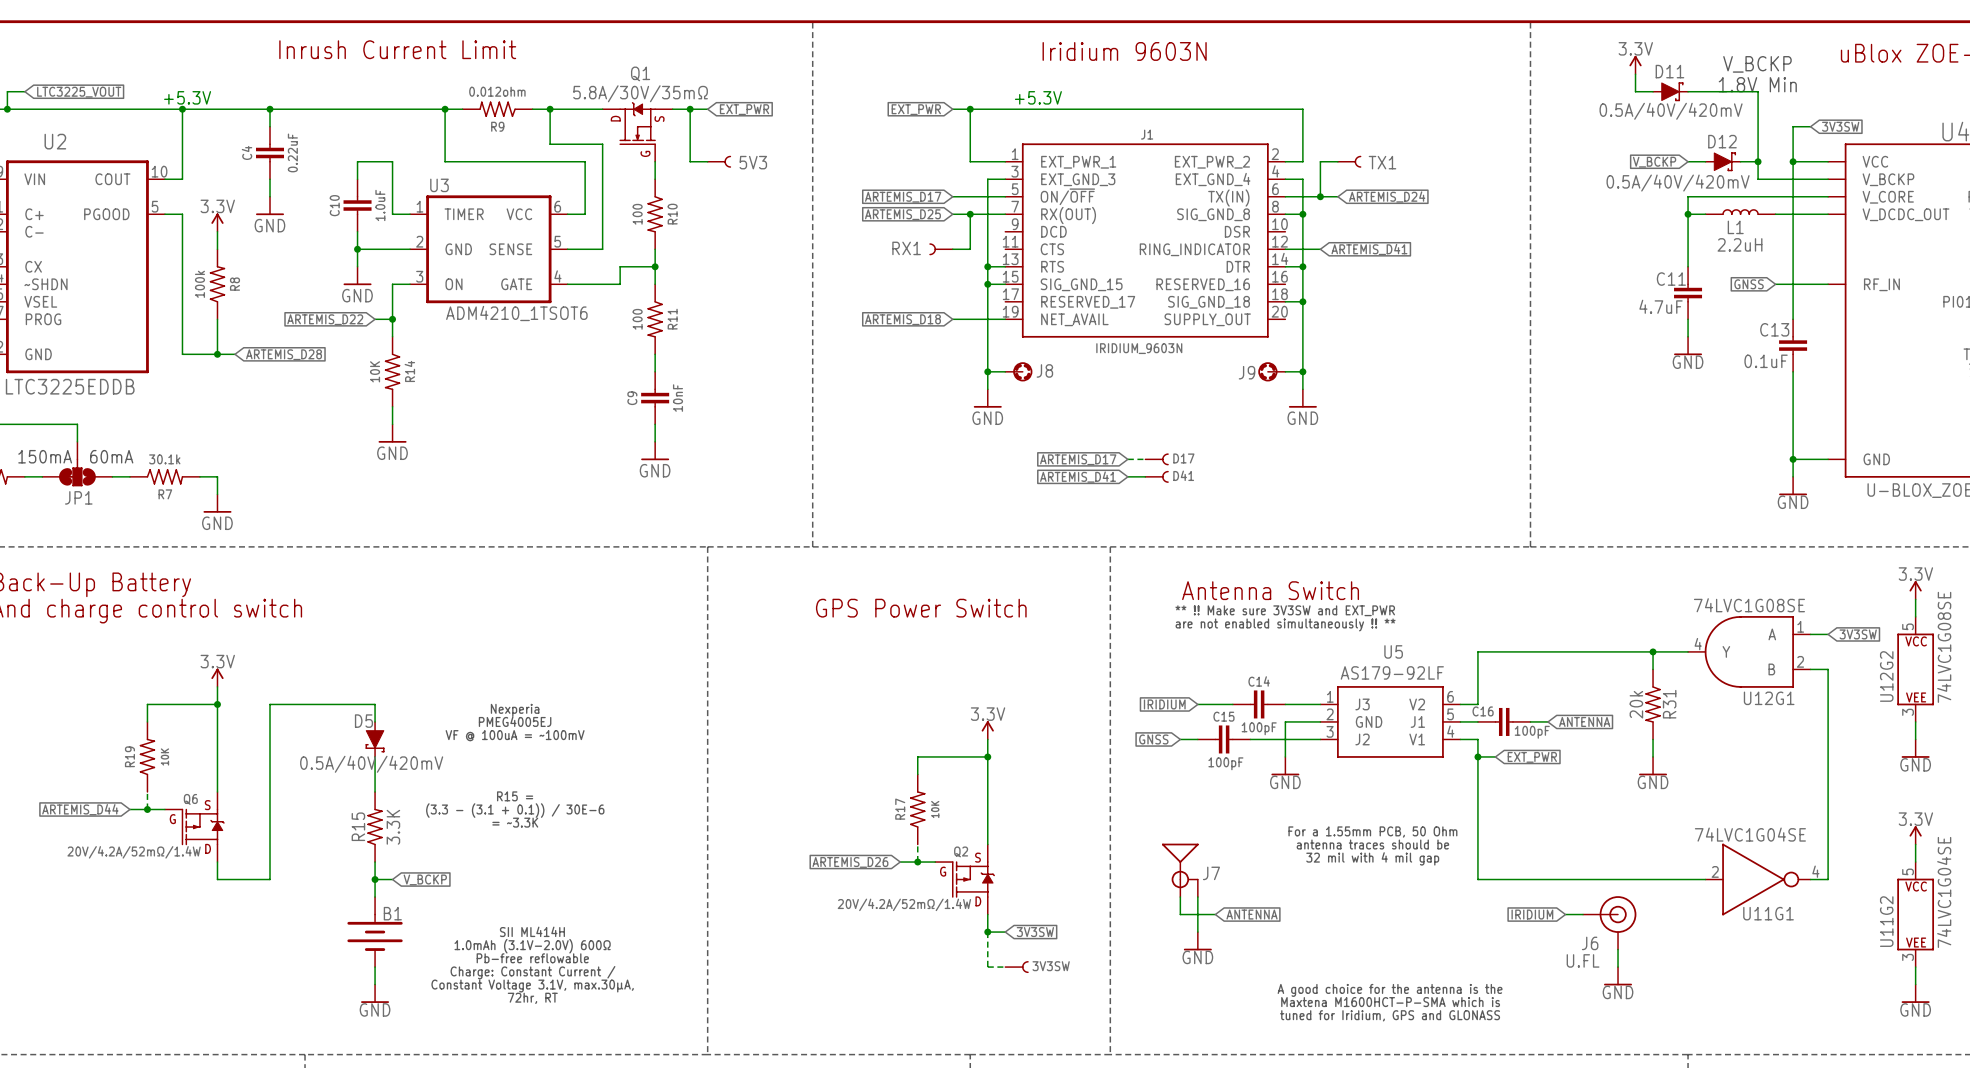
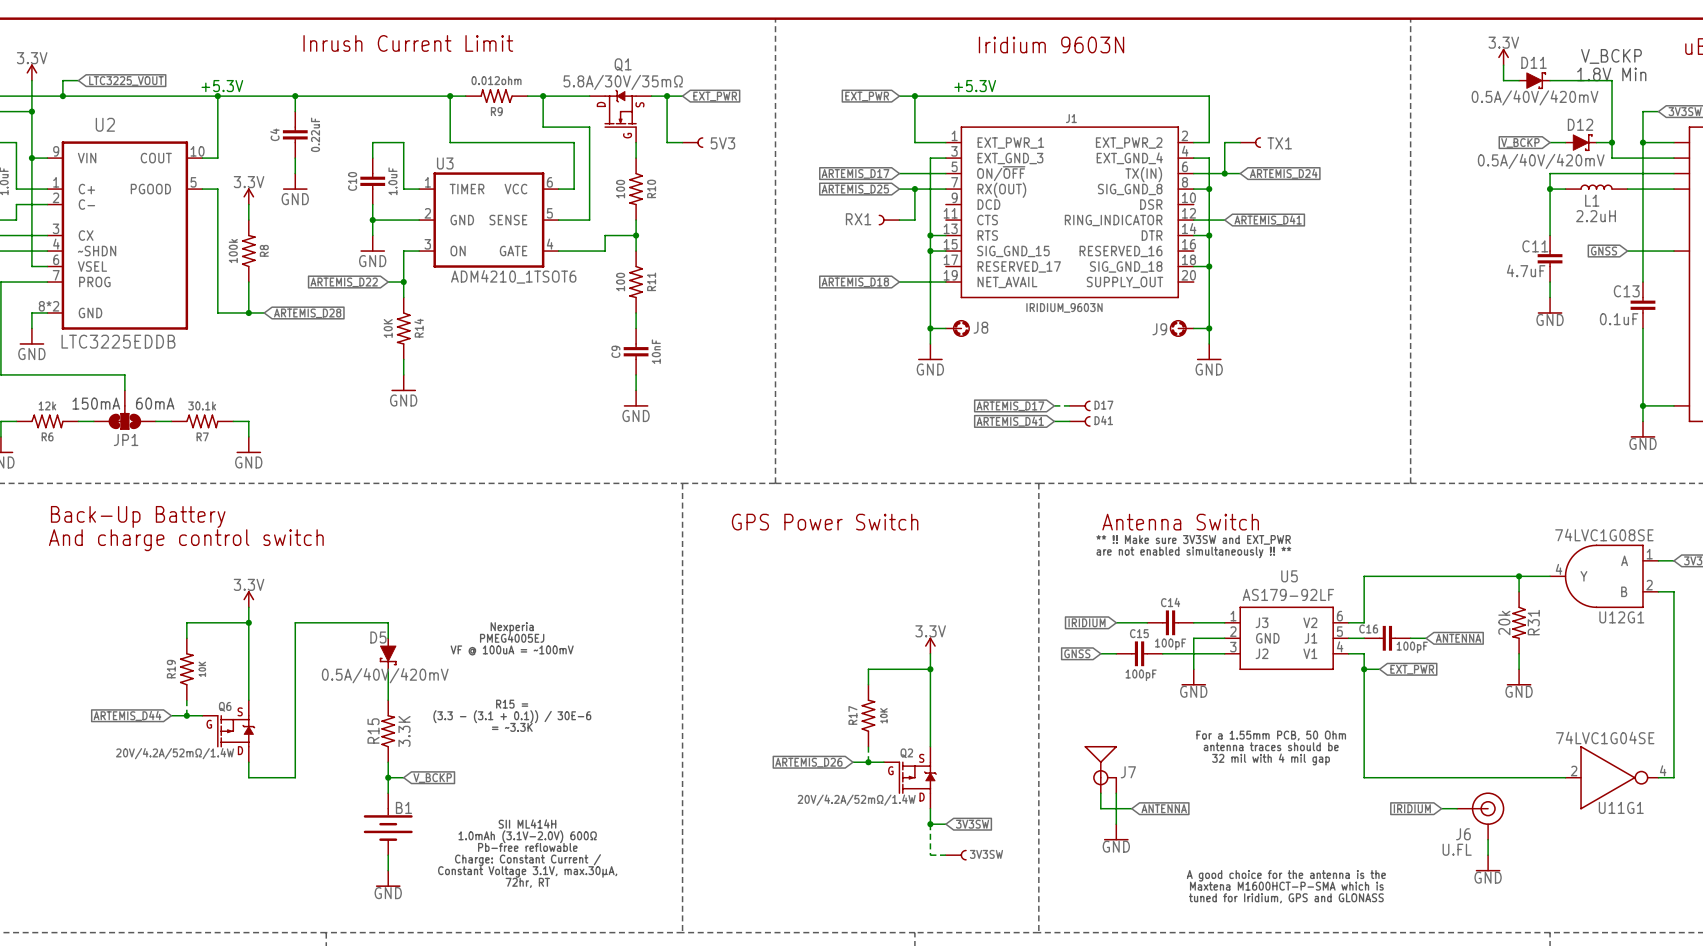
text position: GPS Power Switch (921, 608) -> GPS Power Switch (825, 522)

